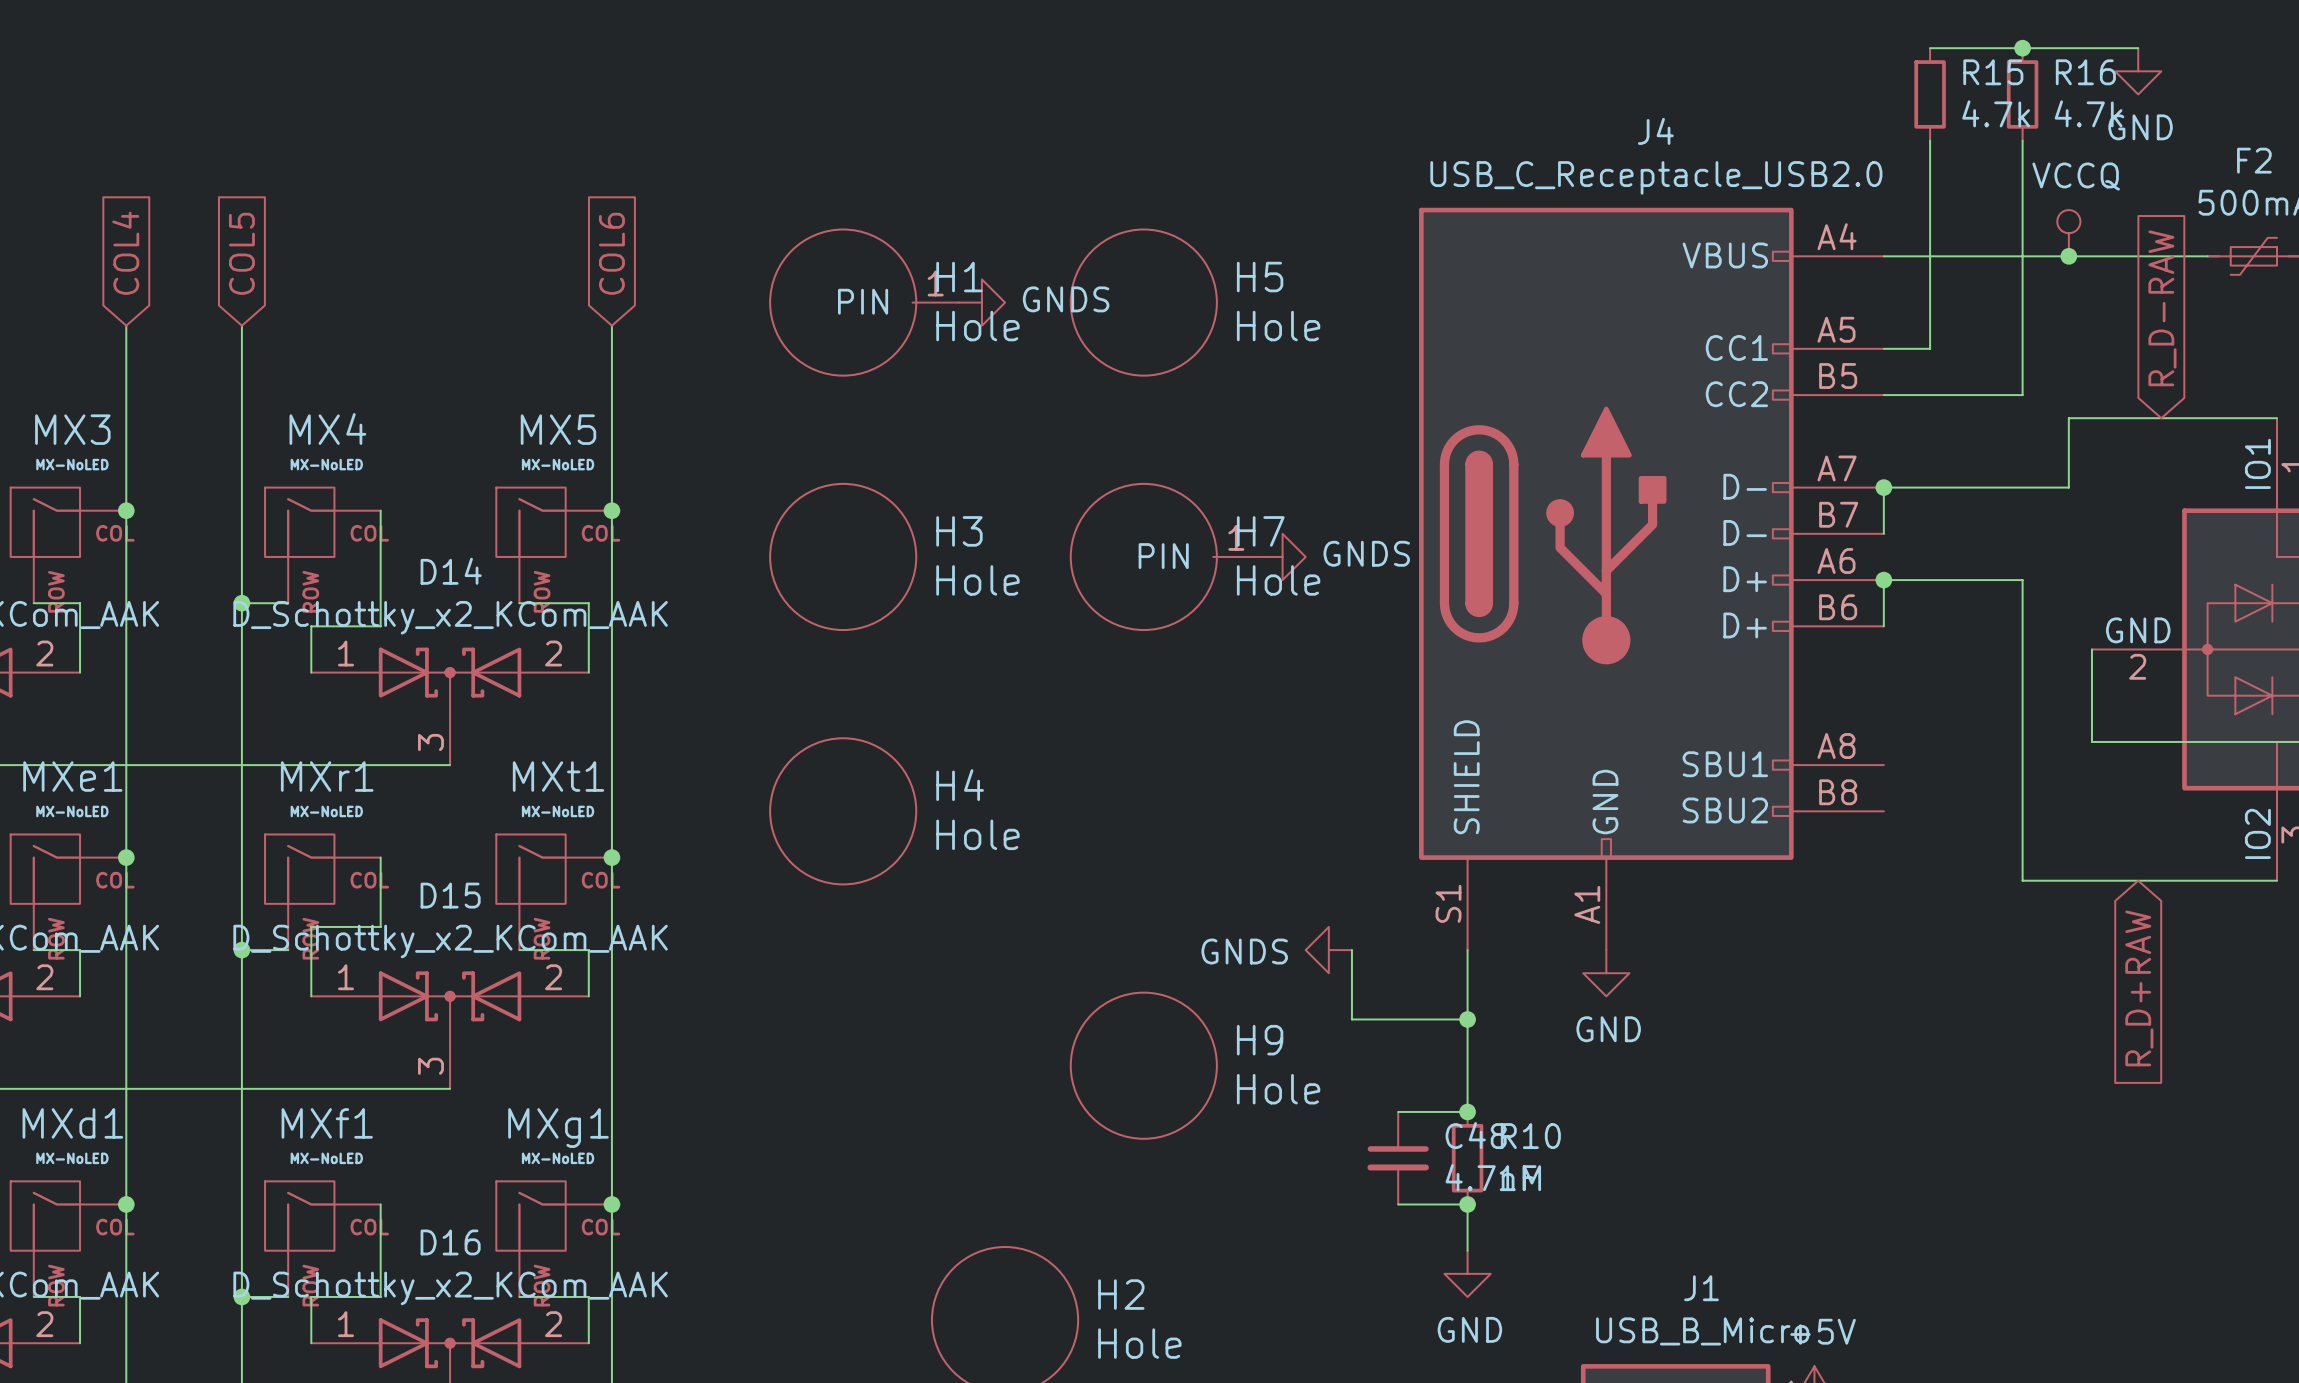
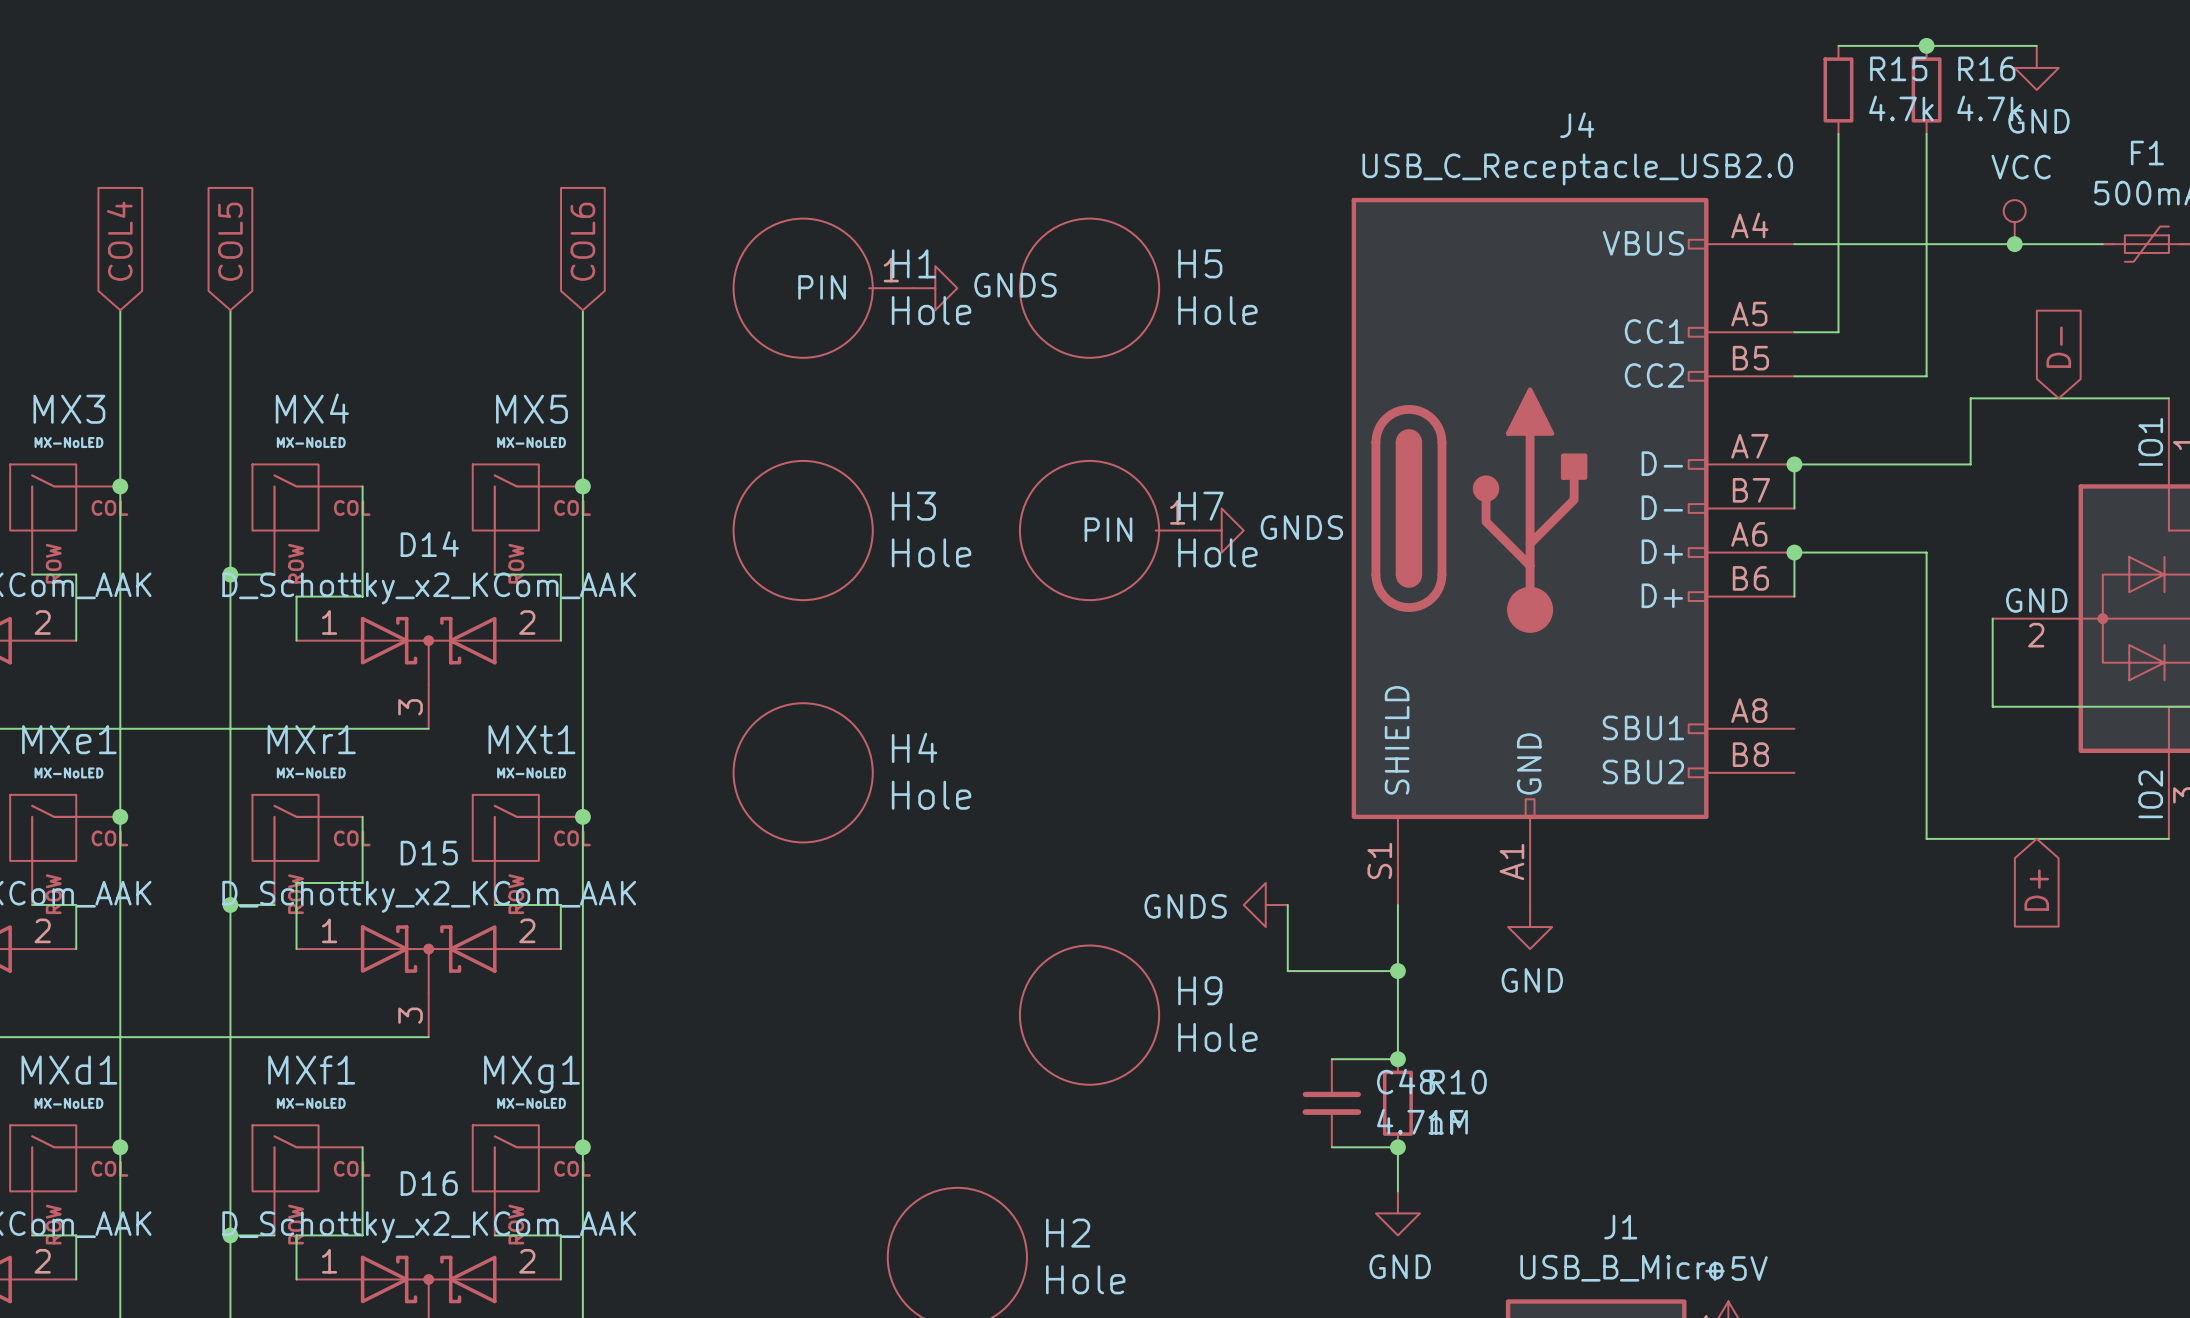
F2 name: F2 (2254, 160) -> F1 (2147, 153)
power symbol: VCCQ (2068, 233) -> none
power symbol: none -> VCC (2014, 222)
junction position: (2068, 256) -> (2014, 244)
global label: R_D-RAW (2162, 308) -> D- (2058, 347)
global label: R_D+RAW (2139, 988) -> D+ (2036, 890)

